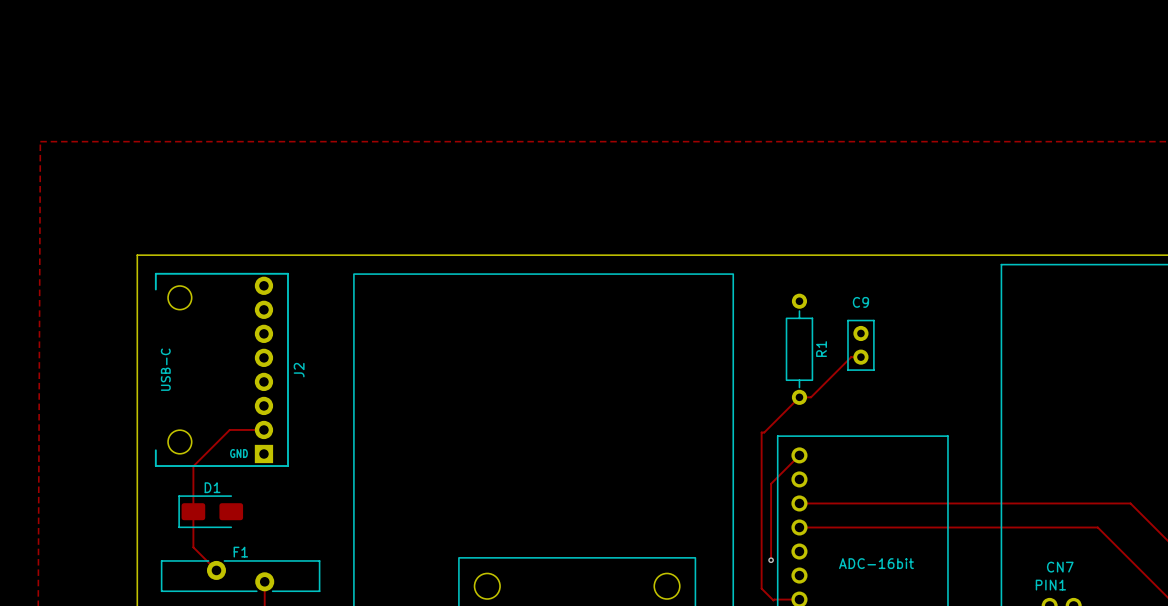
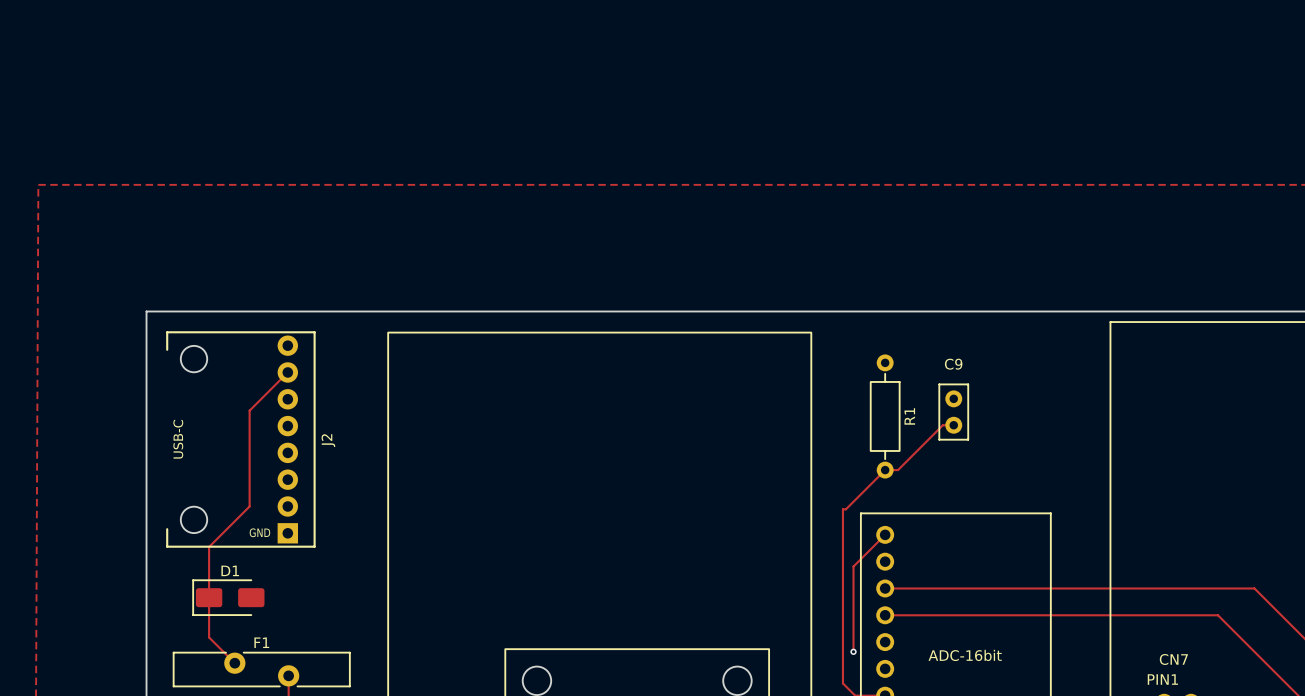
track: (229, 429) (263, 429) -> (249, 506) (249, 410) (287, 372)

